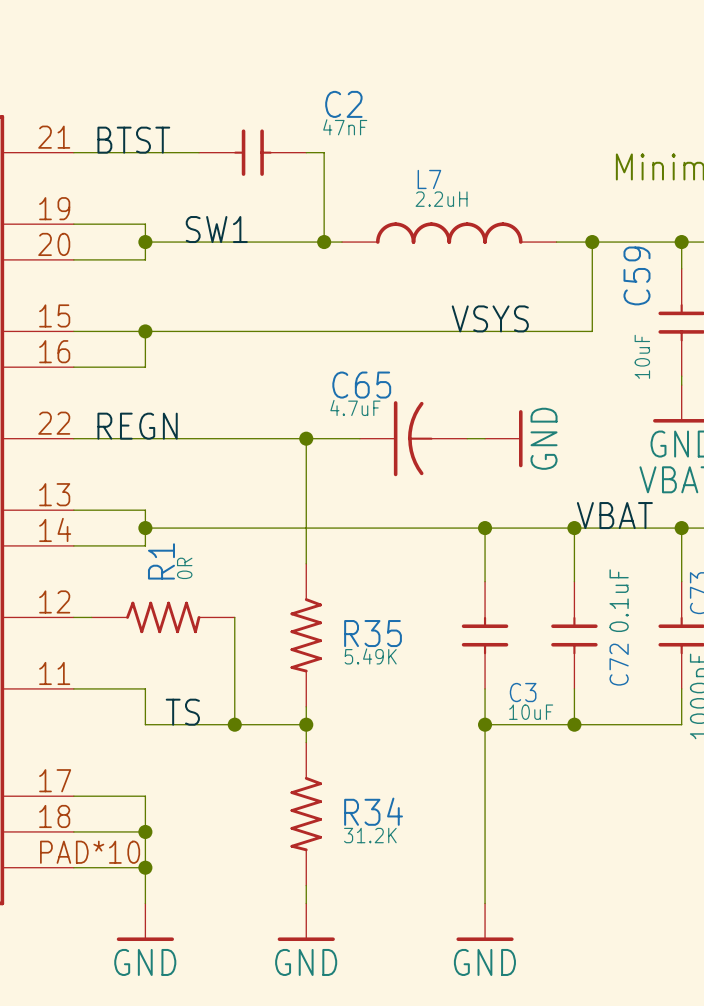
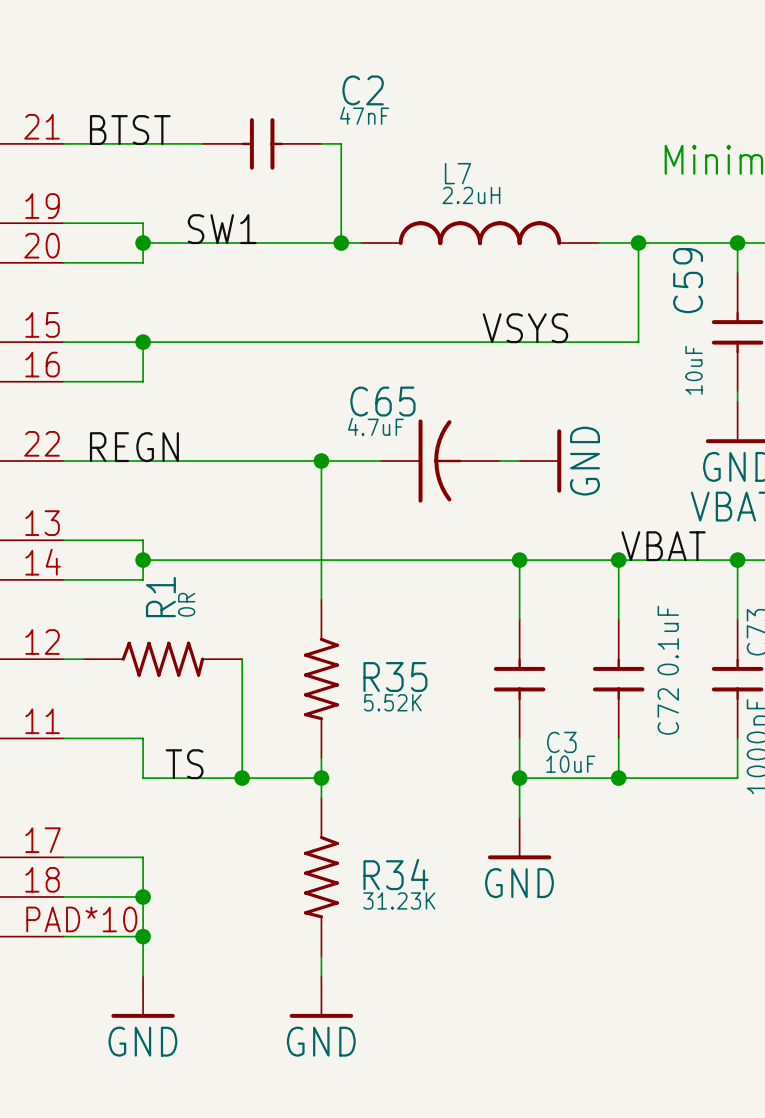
R35 value: 5.49K (370, 656) -> 5.52K (392, 702)
wire: (485, 760) (485, 903) -> none
R34 value: 31.2K (370, 835) -> 31.23K (399, 900)
power symbol position: GND (485, 922) -> GND (519, 838)

